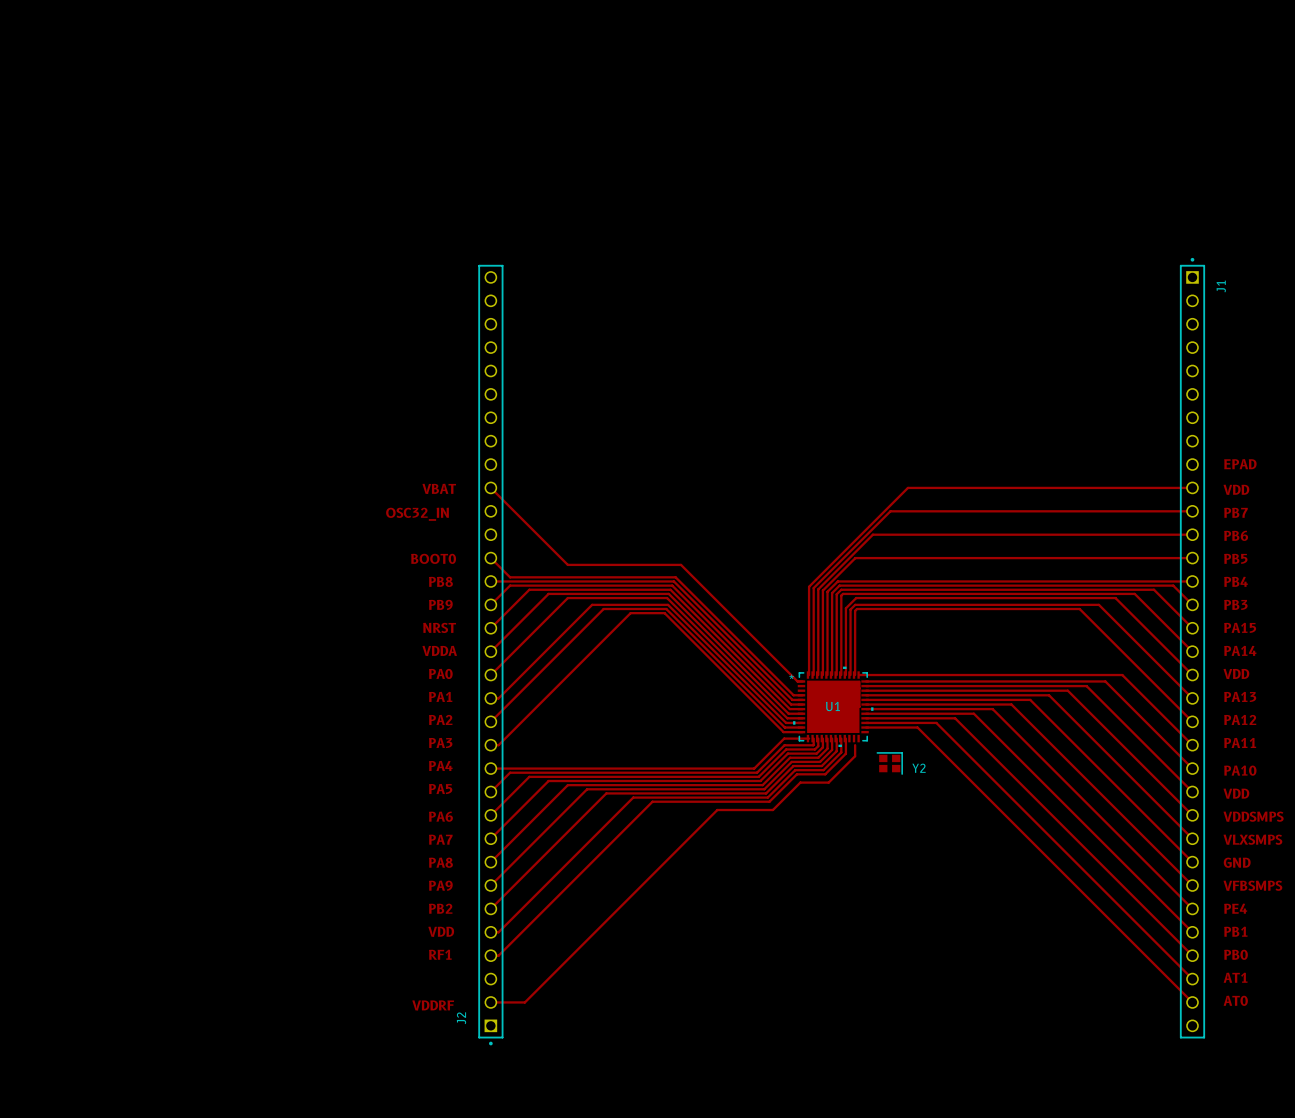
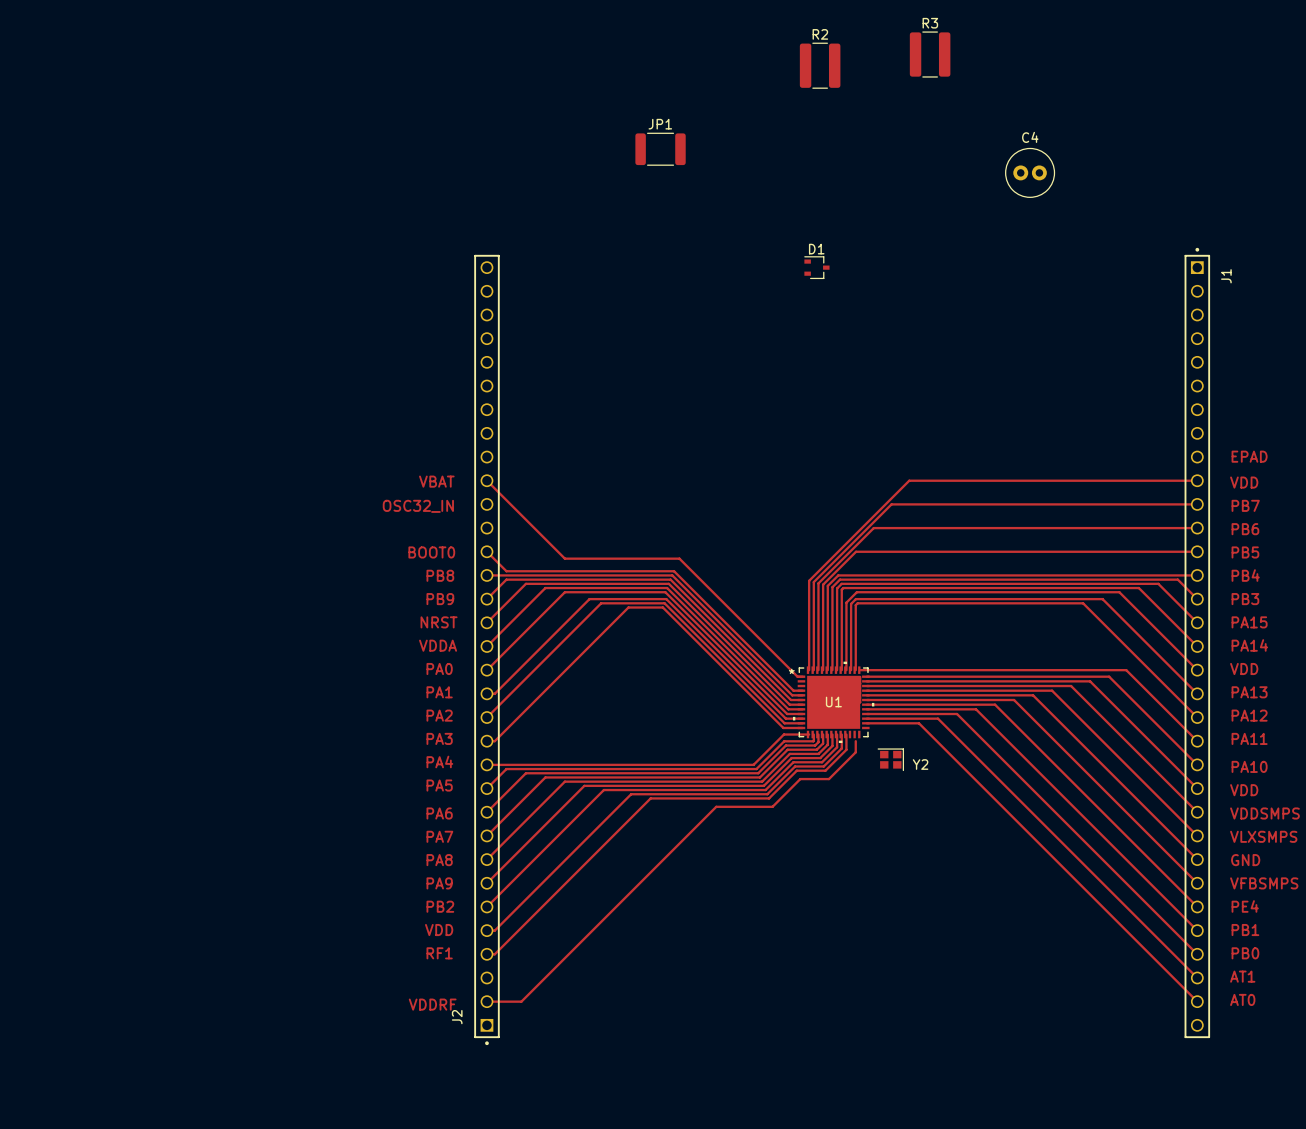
R3: none -> (930, 54)
R2: none -> (820, 65)
JP1: none -> (660, 149)
C4: none -> (1030, 172)
D1: none -> (816, 267)

